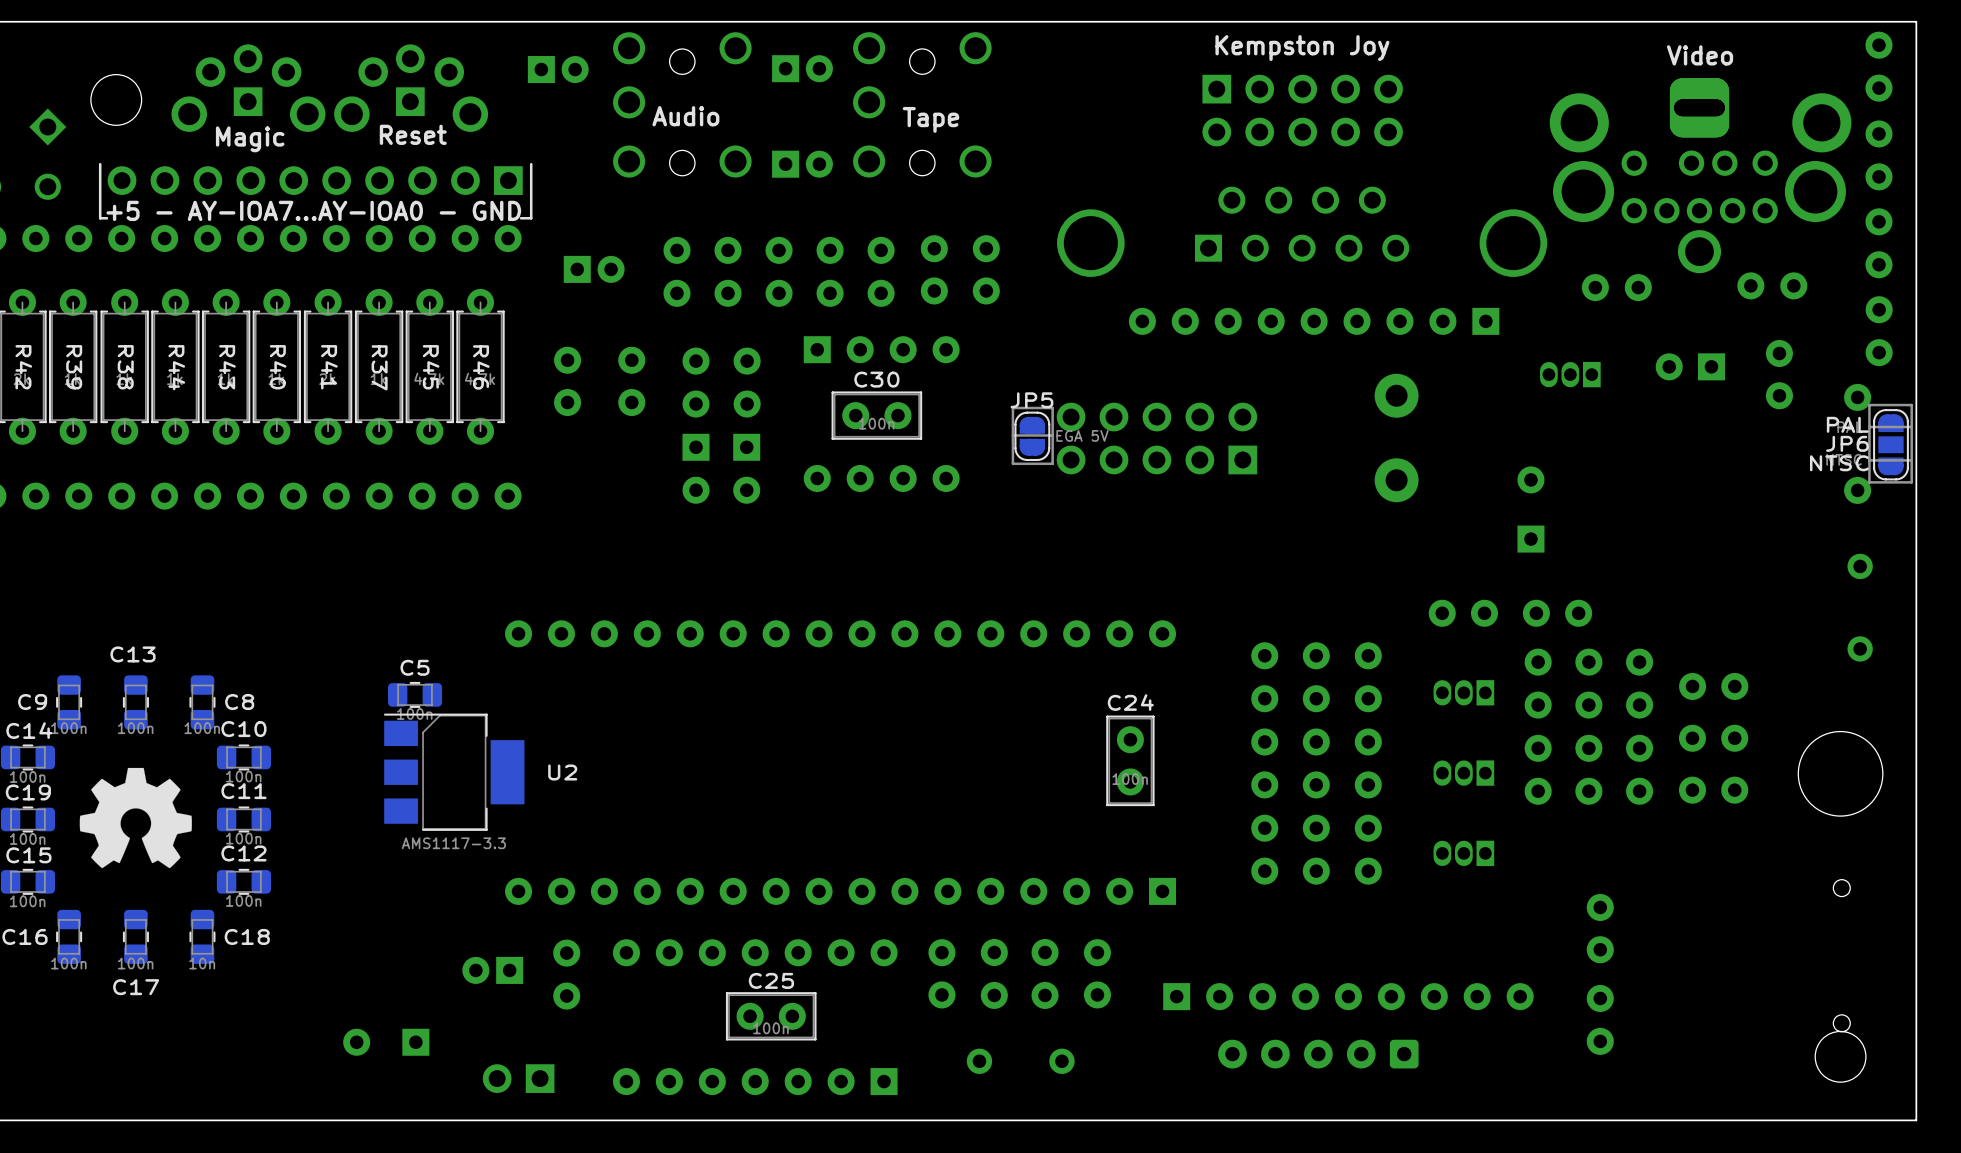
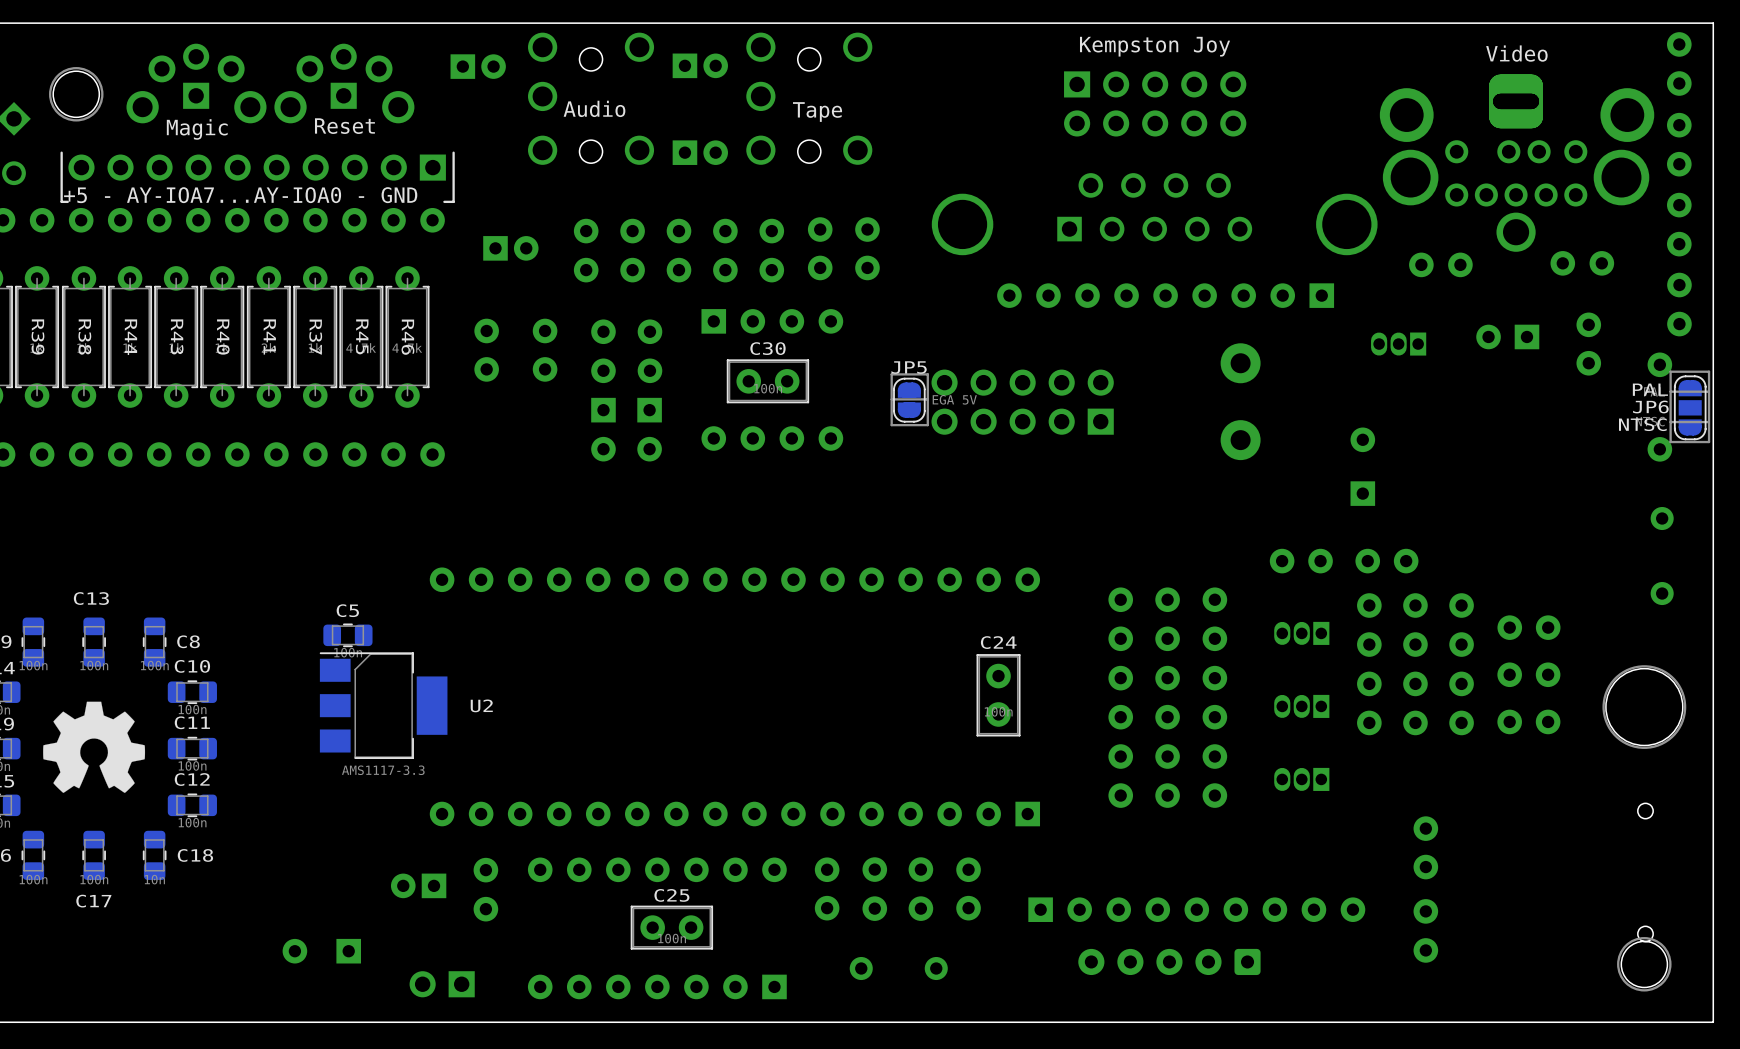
drawing: none -> [49, 67, 104, 122]
drawing: none -> [1602, 665, 1687, 749]
drawing: none -> [1617, 937, 1672, 992]

